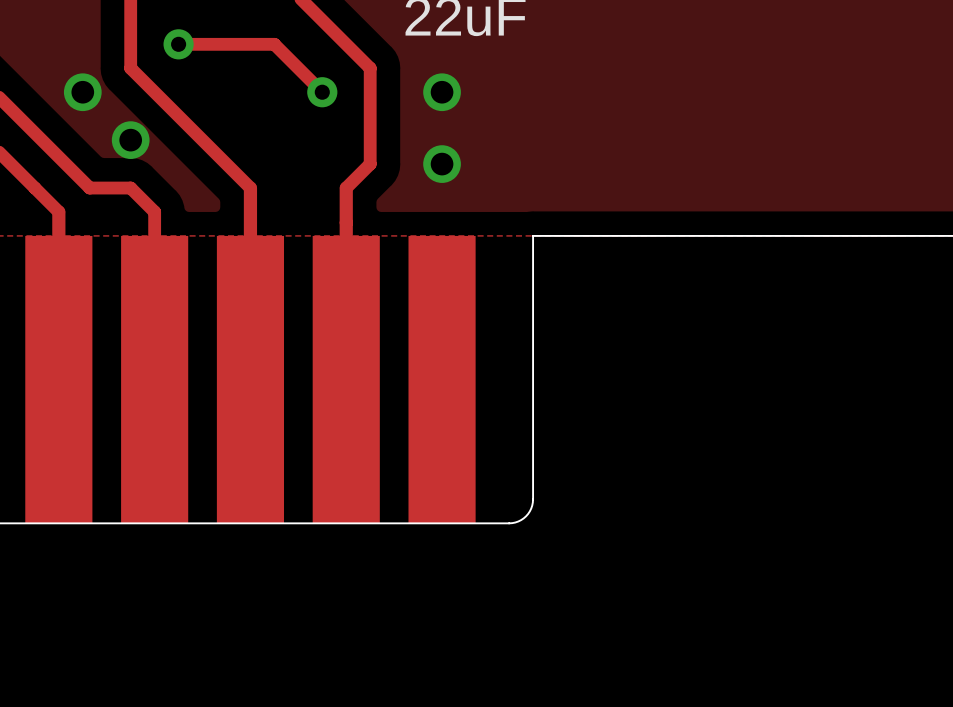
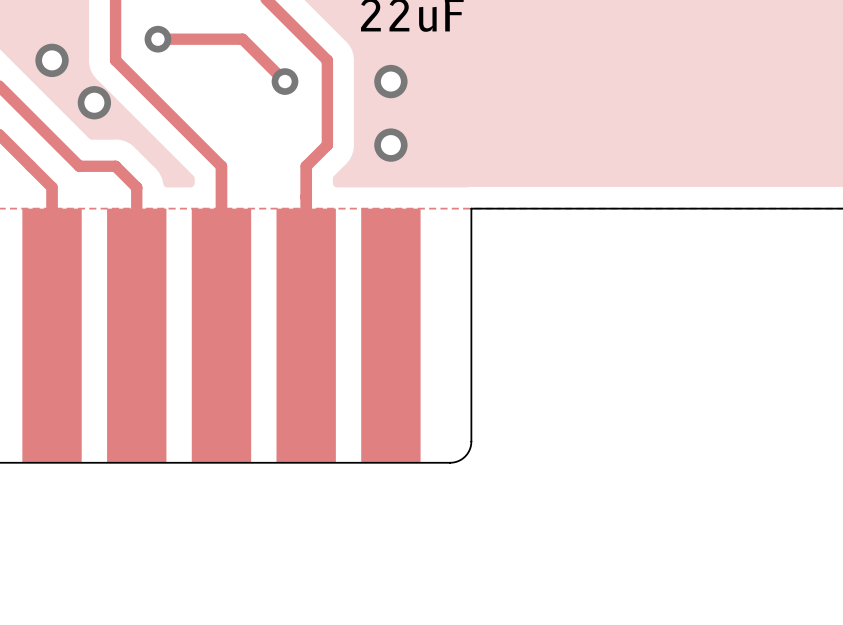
via: none -> (52, 60)
via: (82, 92) -> none
via: none -> (94, 102)
via: (130, 140) -> none

